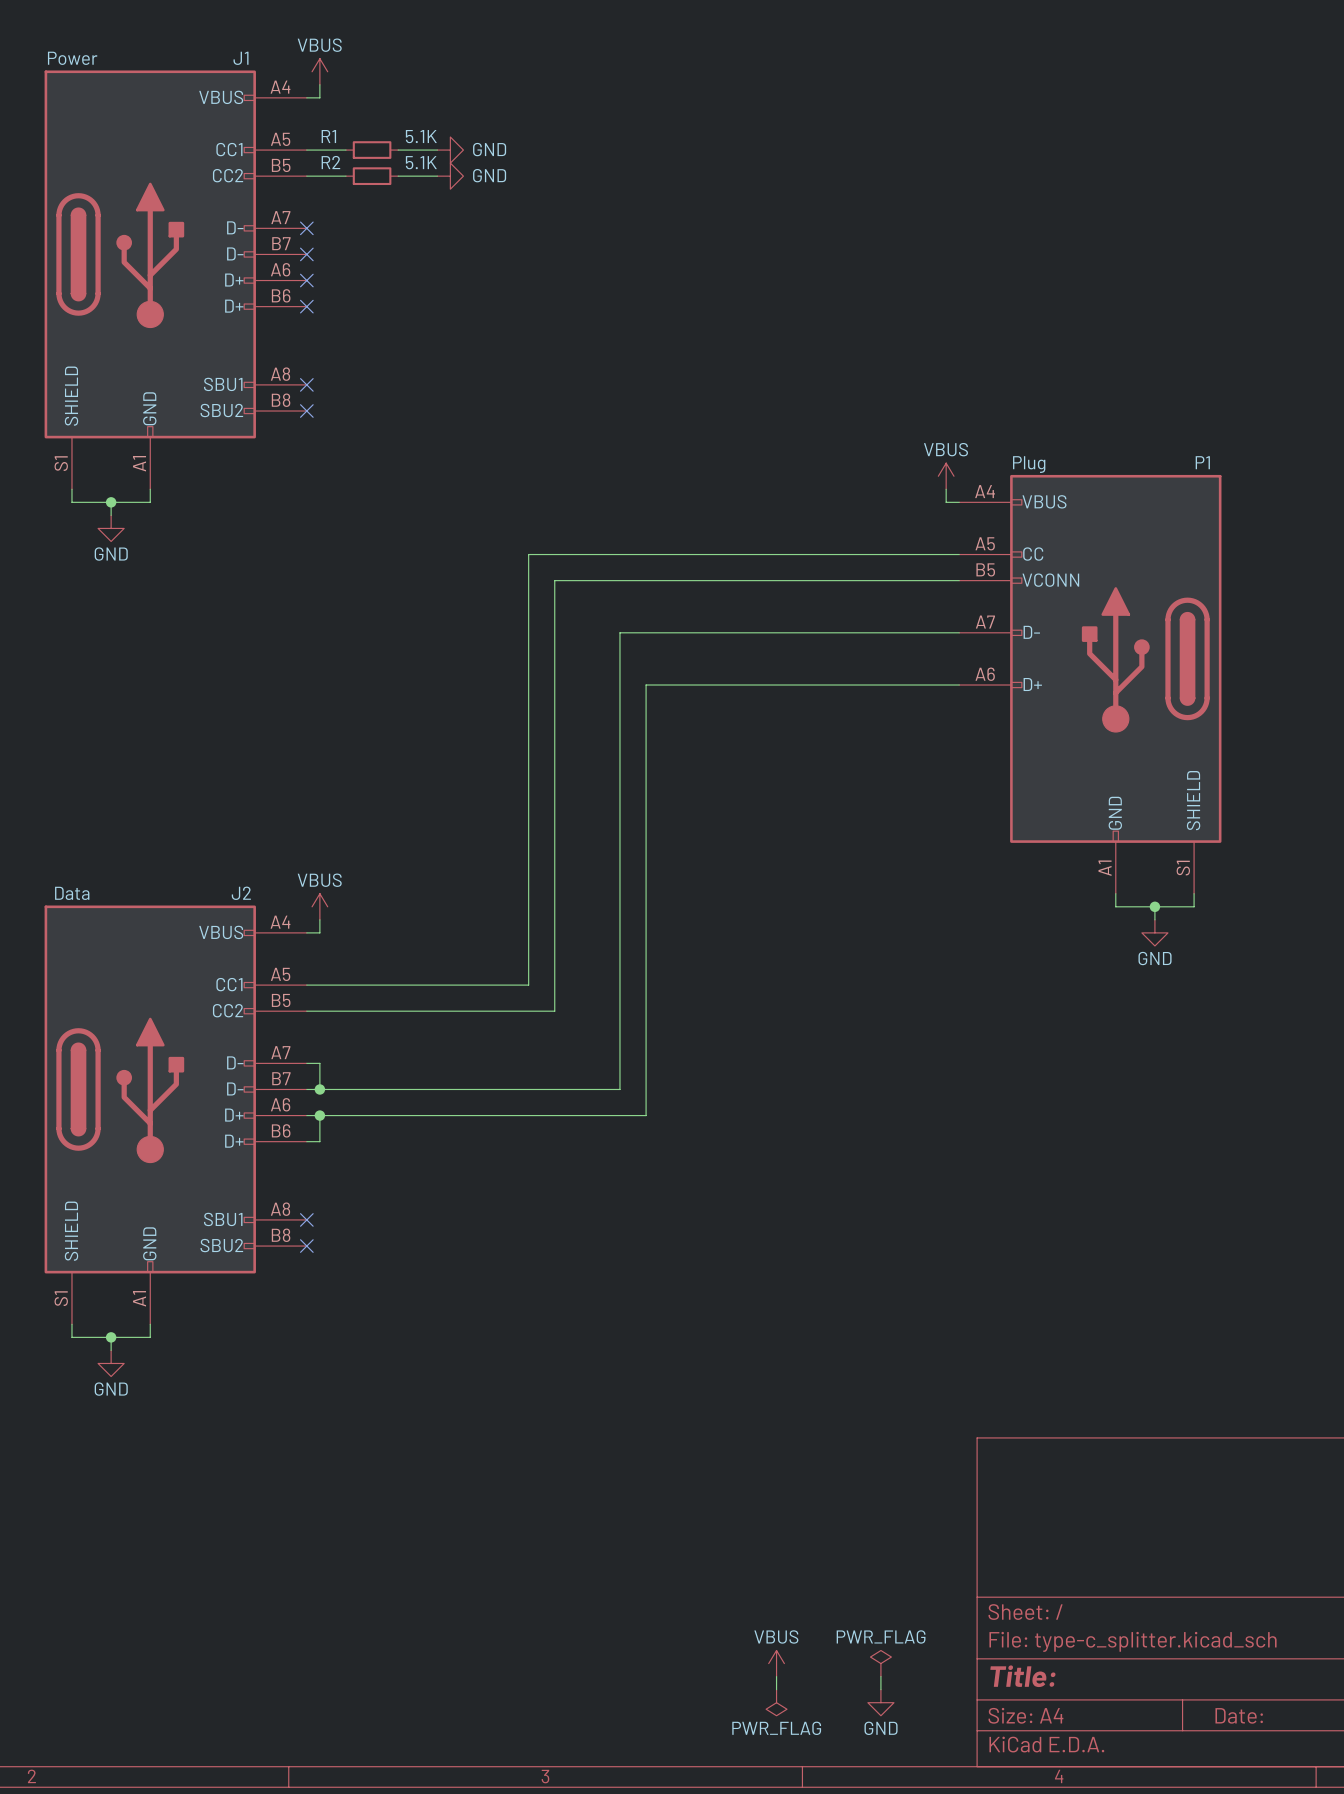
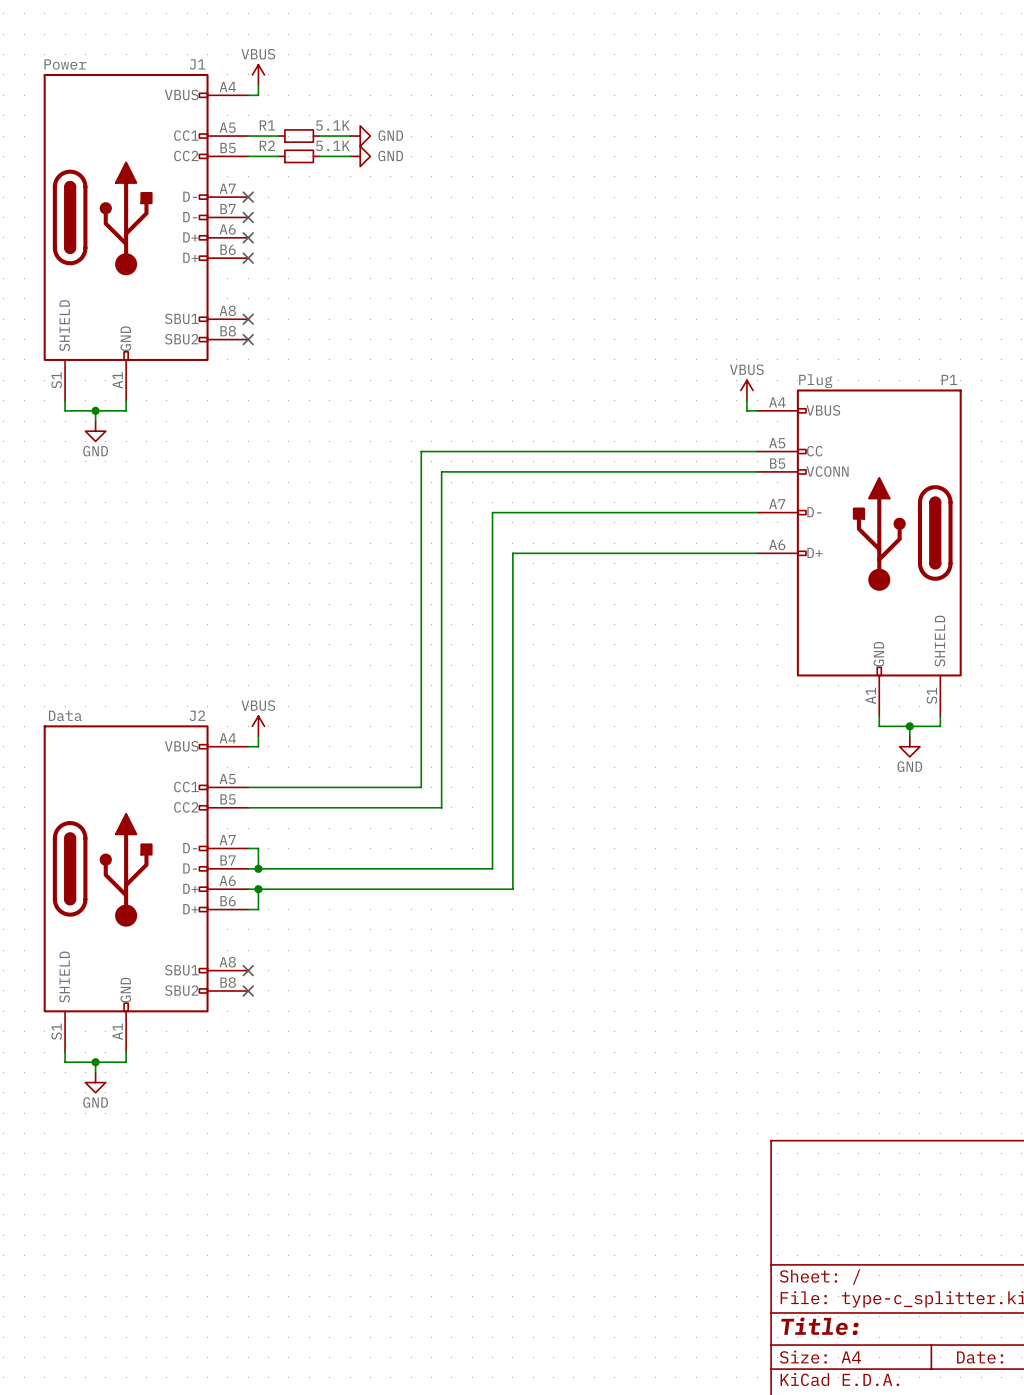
power symbol: VBUS (776, 1663) -> none
power symbol: PWR_FLAG (880, 1663) -> none
wire: (776, 1676) (776, 1689) -> none
wire: (880, 1676) (880, 1689) -> none
power symbol: PWR_FLAG (776, 1702) -> none
power symbol: GND (880, 1702) -> none

